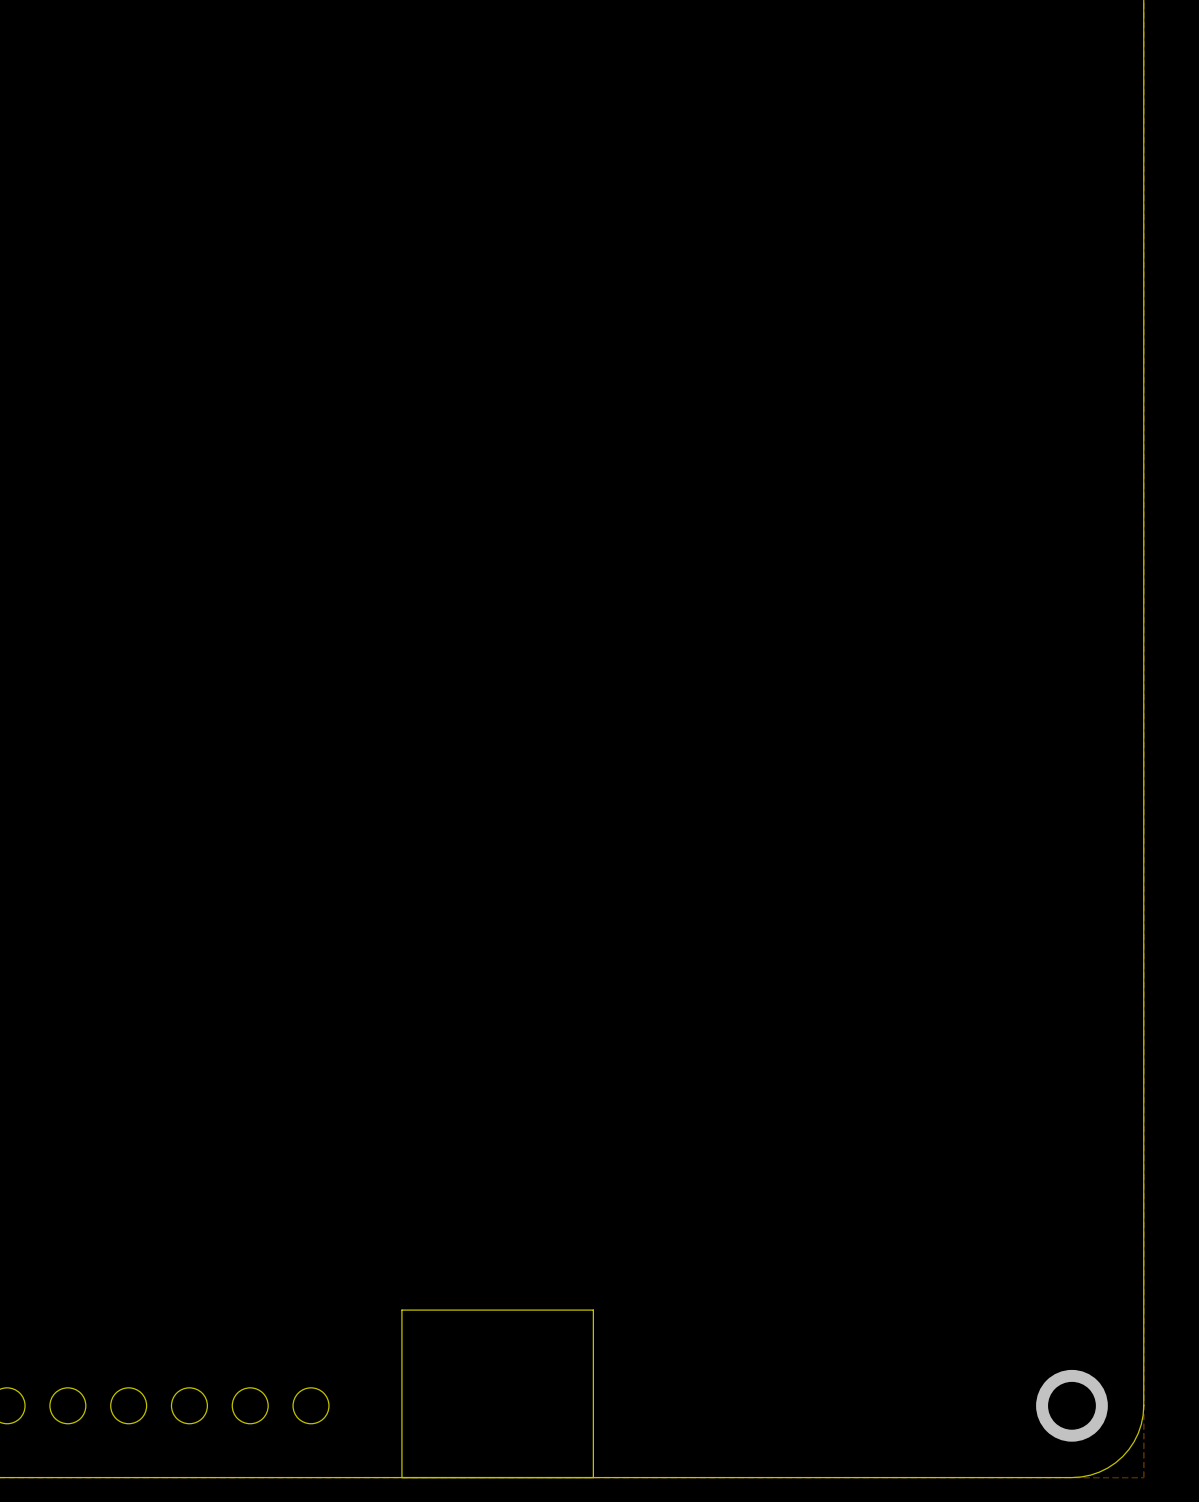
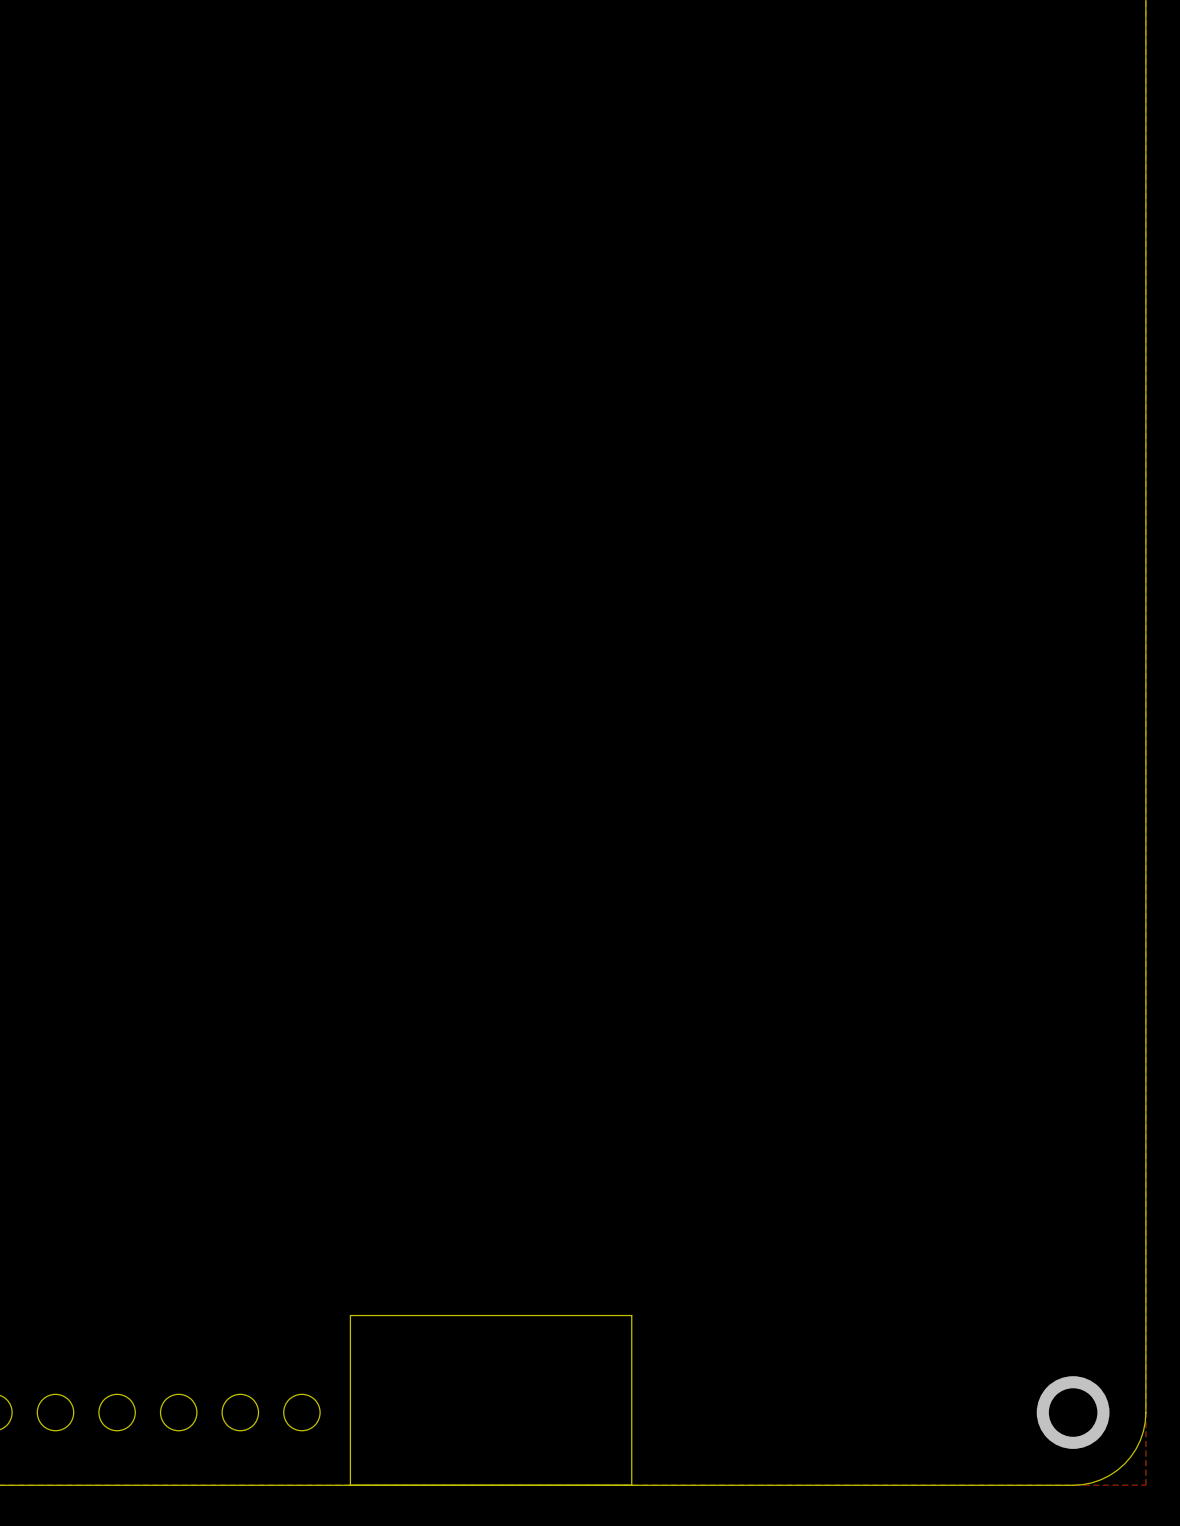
board edge: (401, 1310) (401, 1477) -> (394, 1315) (350, 1315) (350, 1485)
board edge: (593, 1310) (593, 1477) -> (588, 1315) (631, 1315) (631, 1485)

